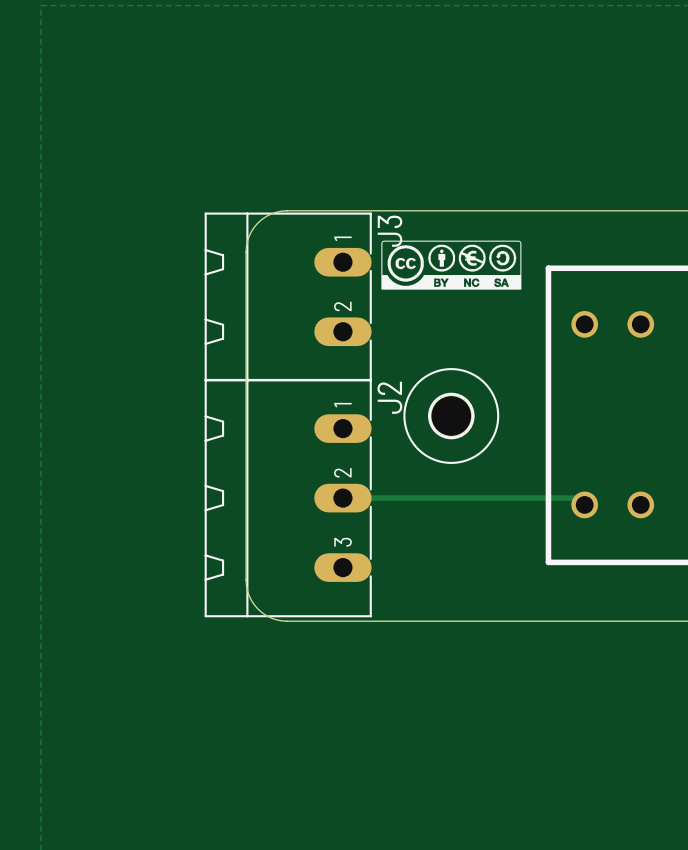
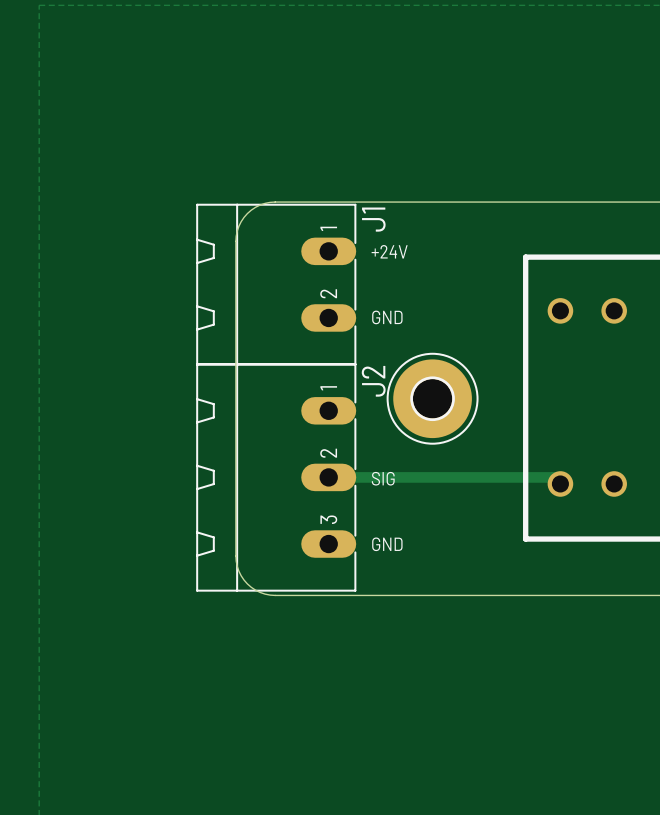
J3 name: J3 (390, 231) -> J1 (373, 219)
drawing: [381, 240, 522, 290] -> none
text: none -> +24V (389, 251)
text: none -> GND (387, 317)
part footprint: [403, 368, 500, 464] -> [386, 352, 479, 445]
track width: thin (342, 498) (577, 498) (584, 504) -> thick (328, 477) (553, 477) (560, 483)
text: none -> SIG (383, 478)
text: none -> GND (387, 544)

